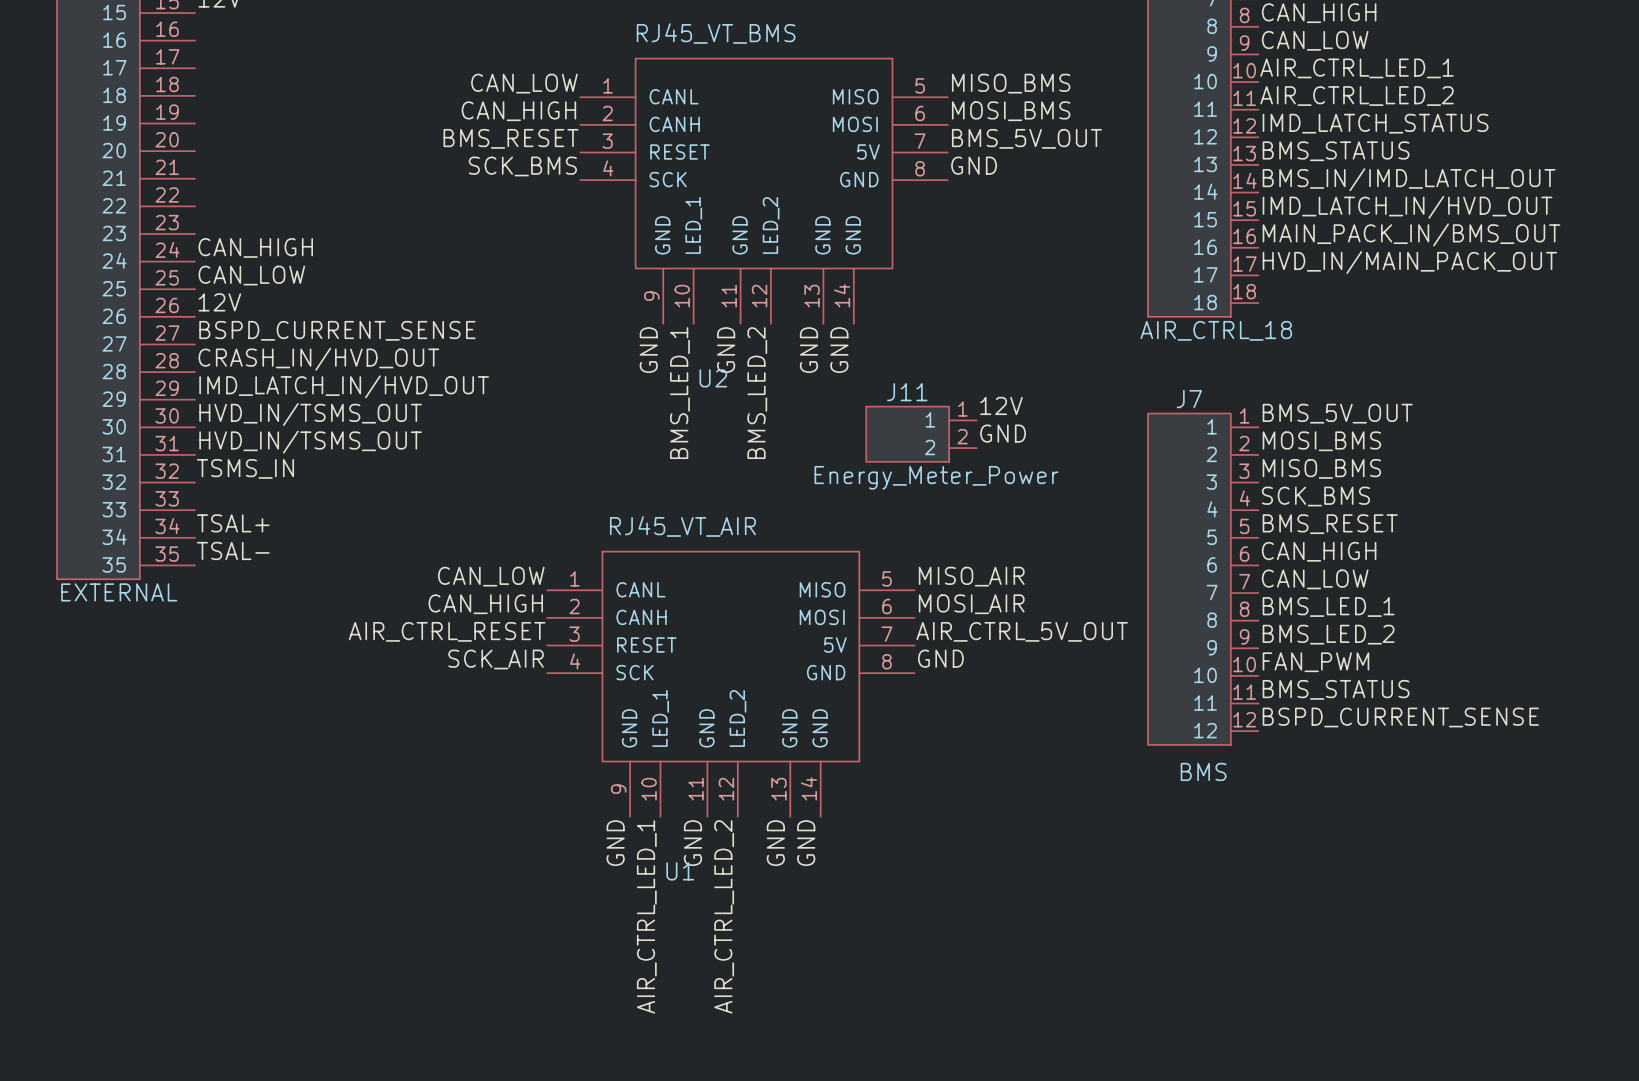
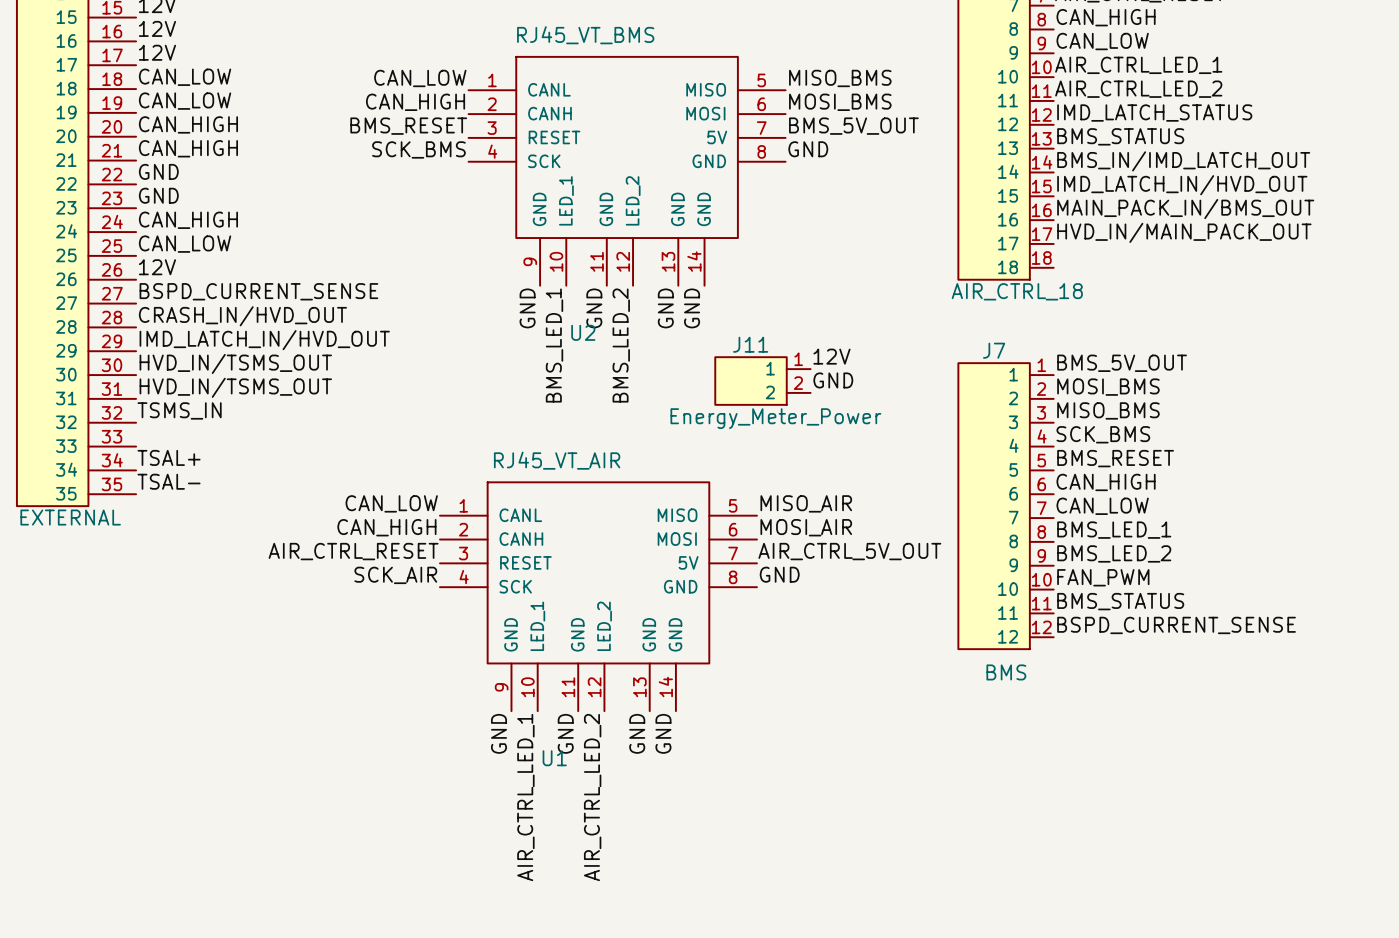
label: none -> 12V (157, 28)
label: none -> 12V (157, 52)
label: none -> CAN_LOW (185, 77)
label: none -> CAN_LOW (185, 101)
label: none -> CAN_HIGH (188, 124)
label: none -> CAN_HIGH (188, 148)
label: none -> GND (158, 171)
label: none -> GND (158, 195)

